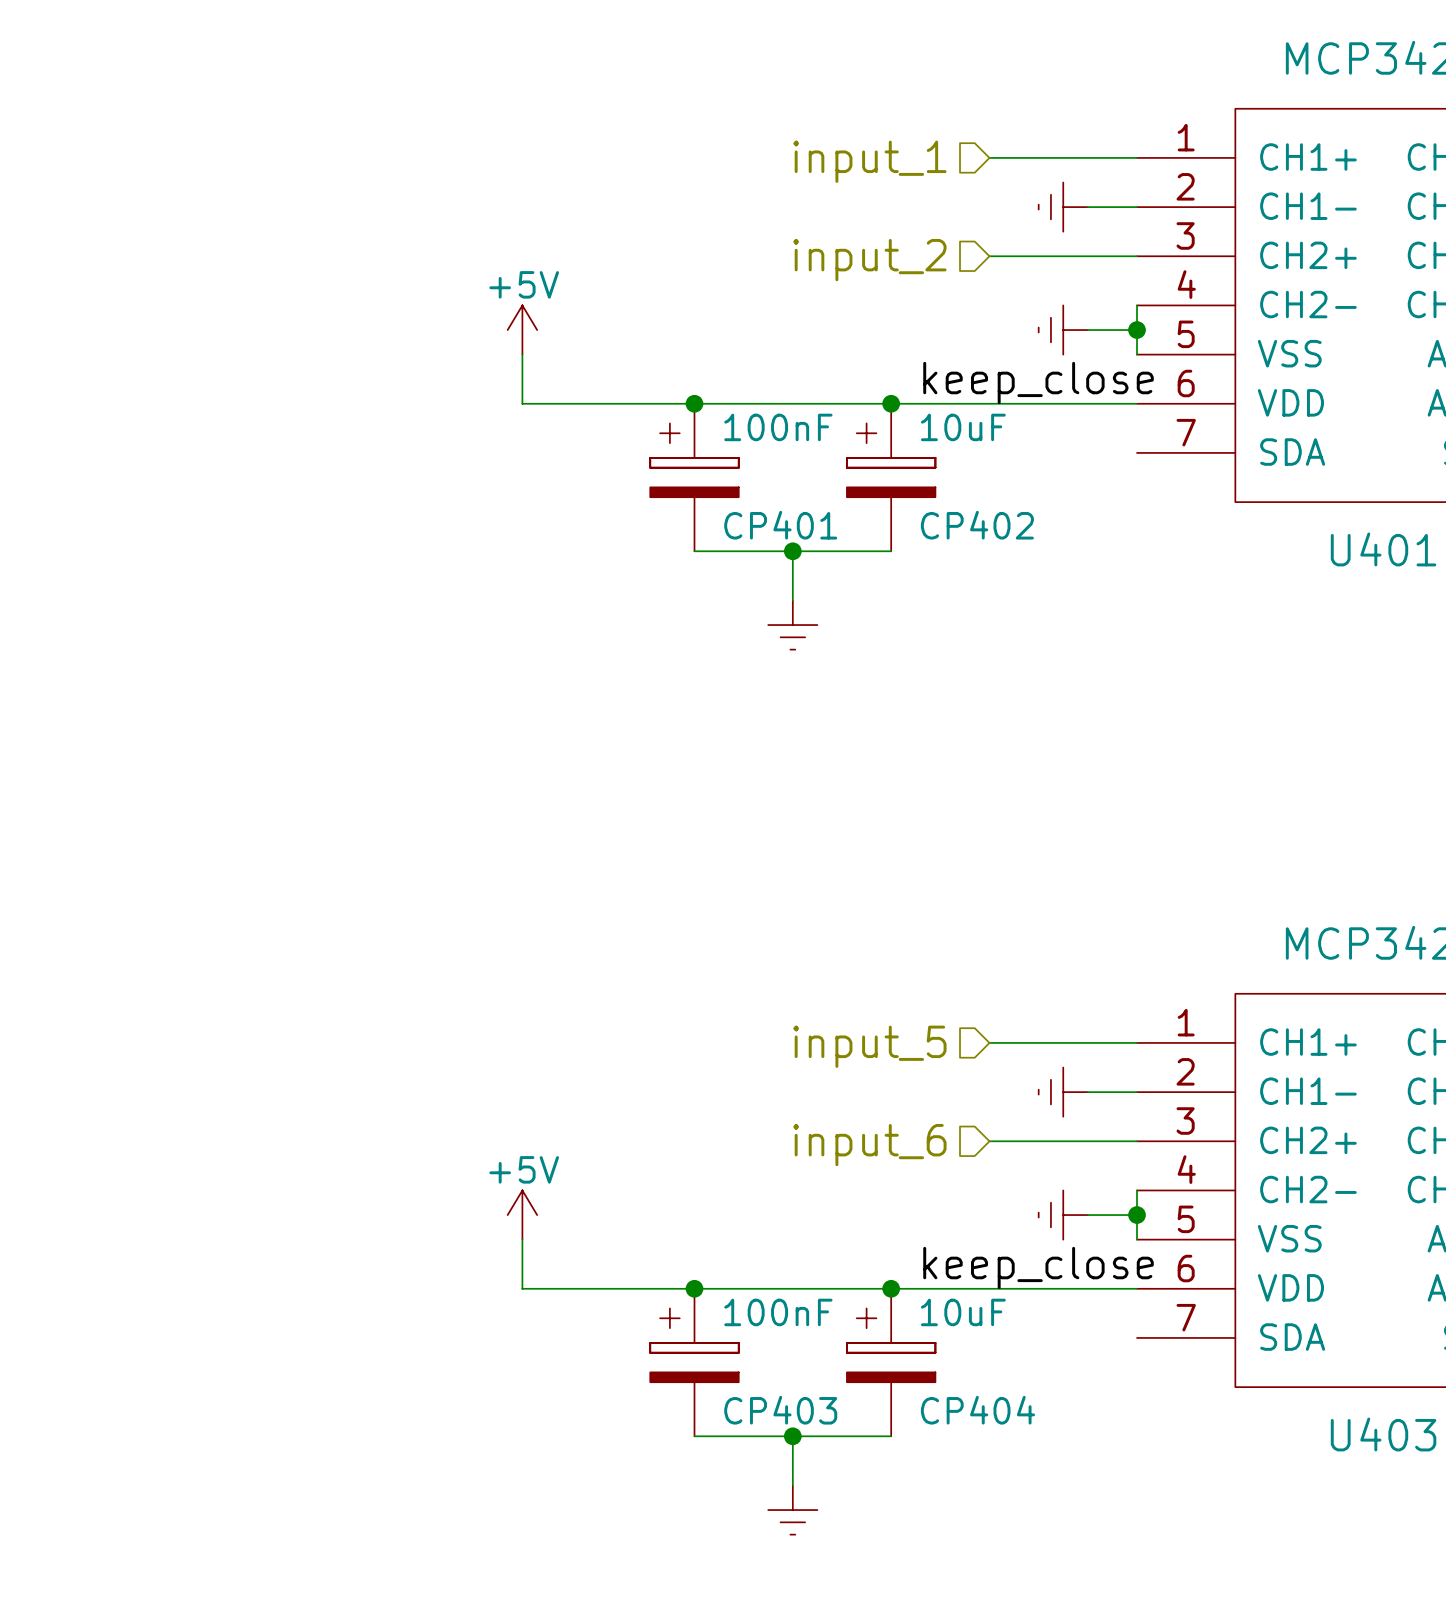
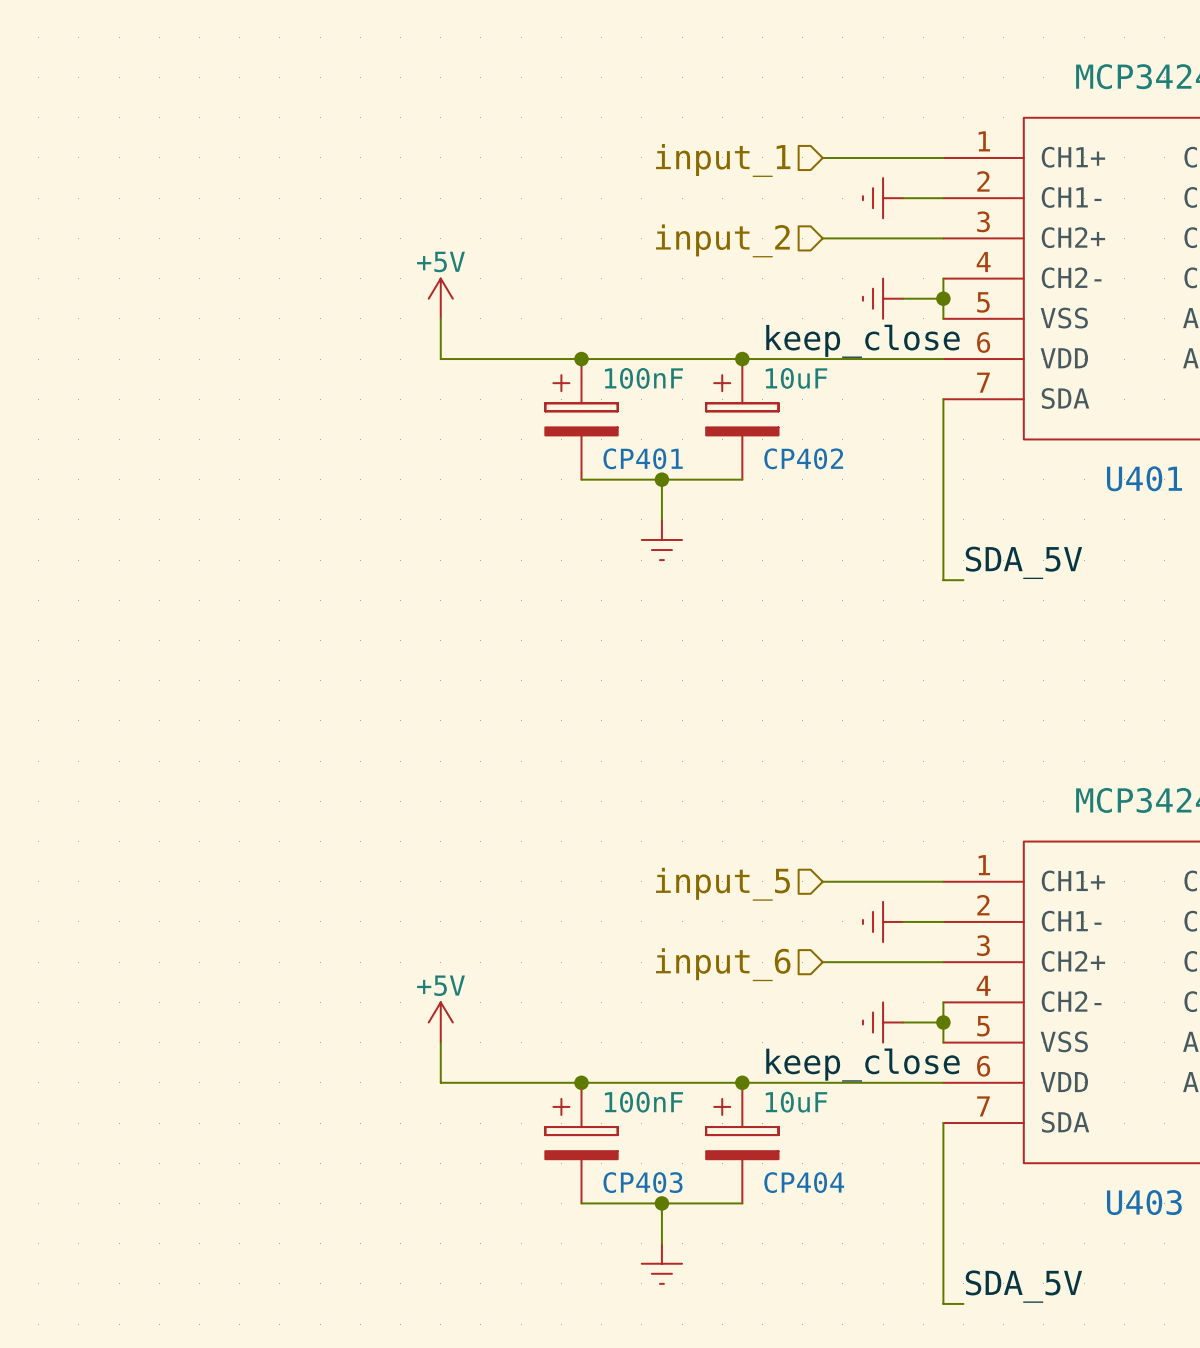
wire: none -> (943, 399) (943, 580) (963, 580)
label: none -> SDA_5V (1023, 562)
wire: none -> (943, 1123) (943, 1303) (963, 1303)
label: none -> SDA_5V (1023, 1286)

